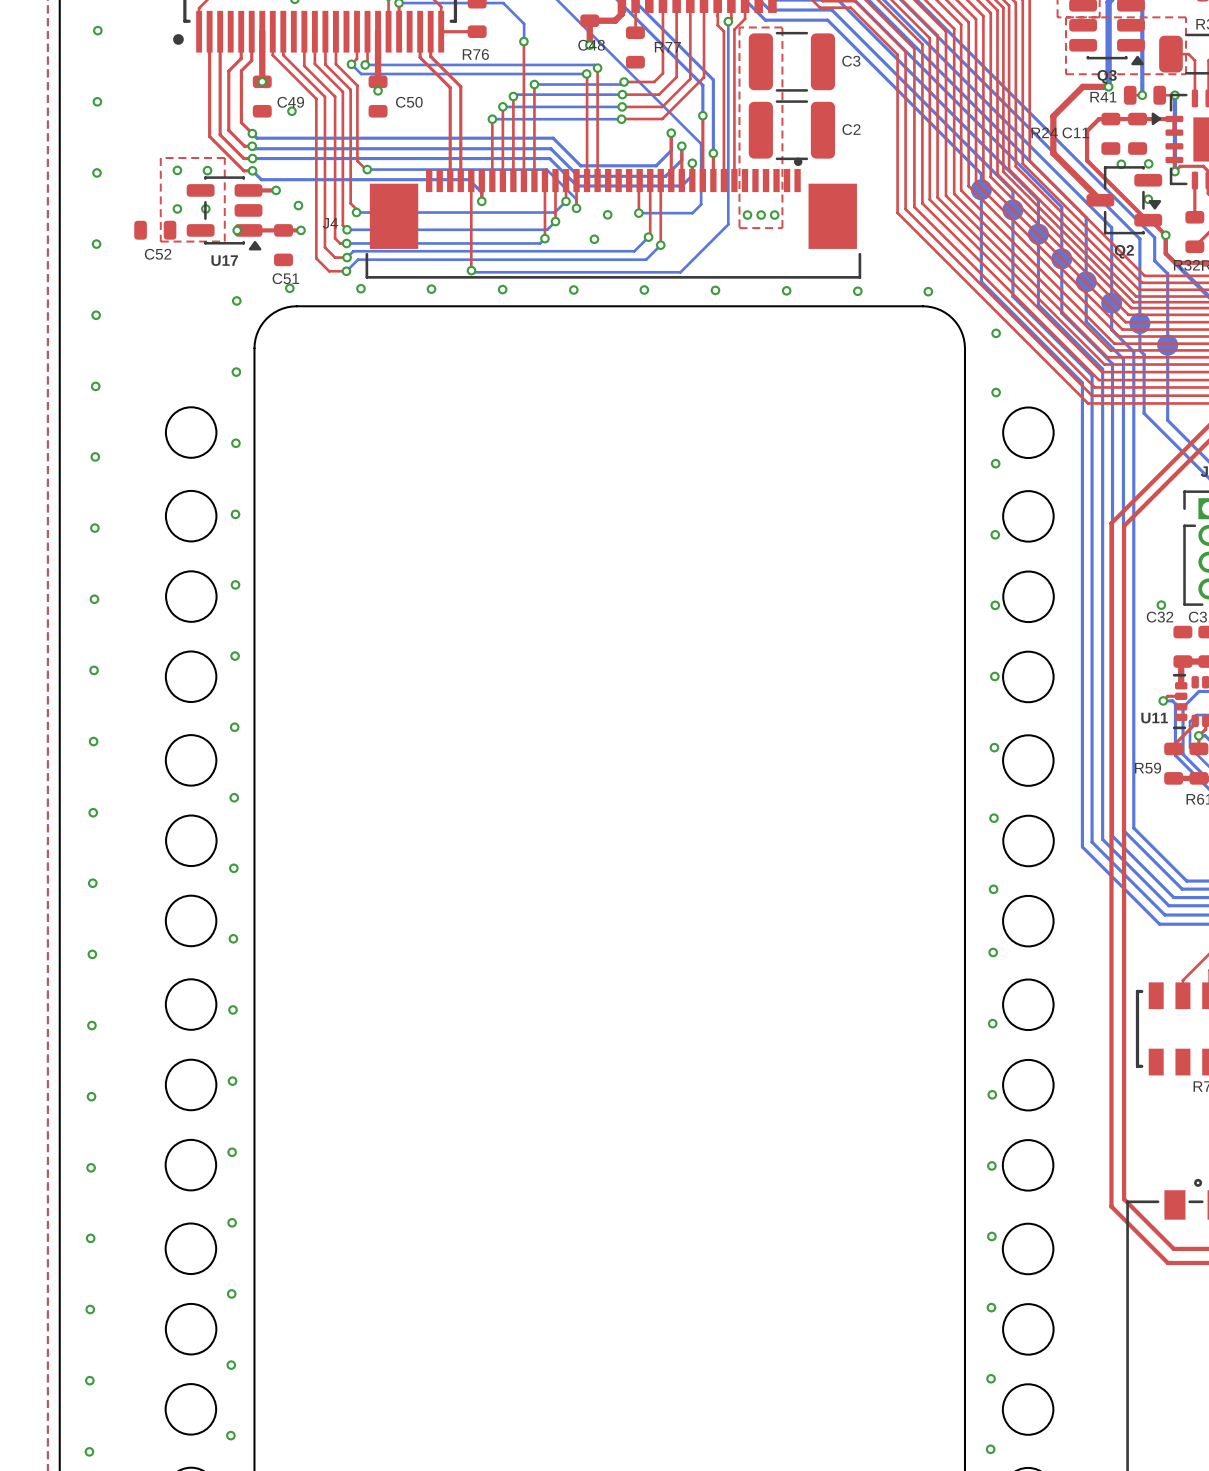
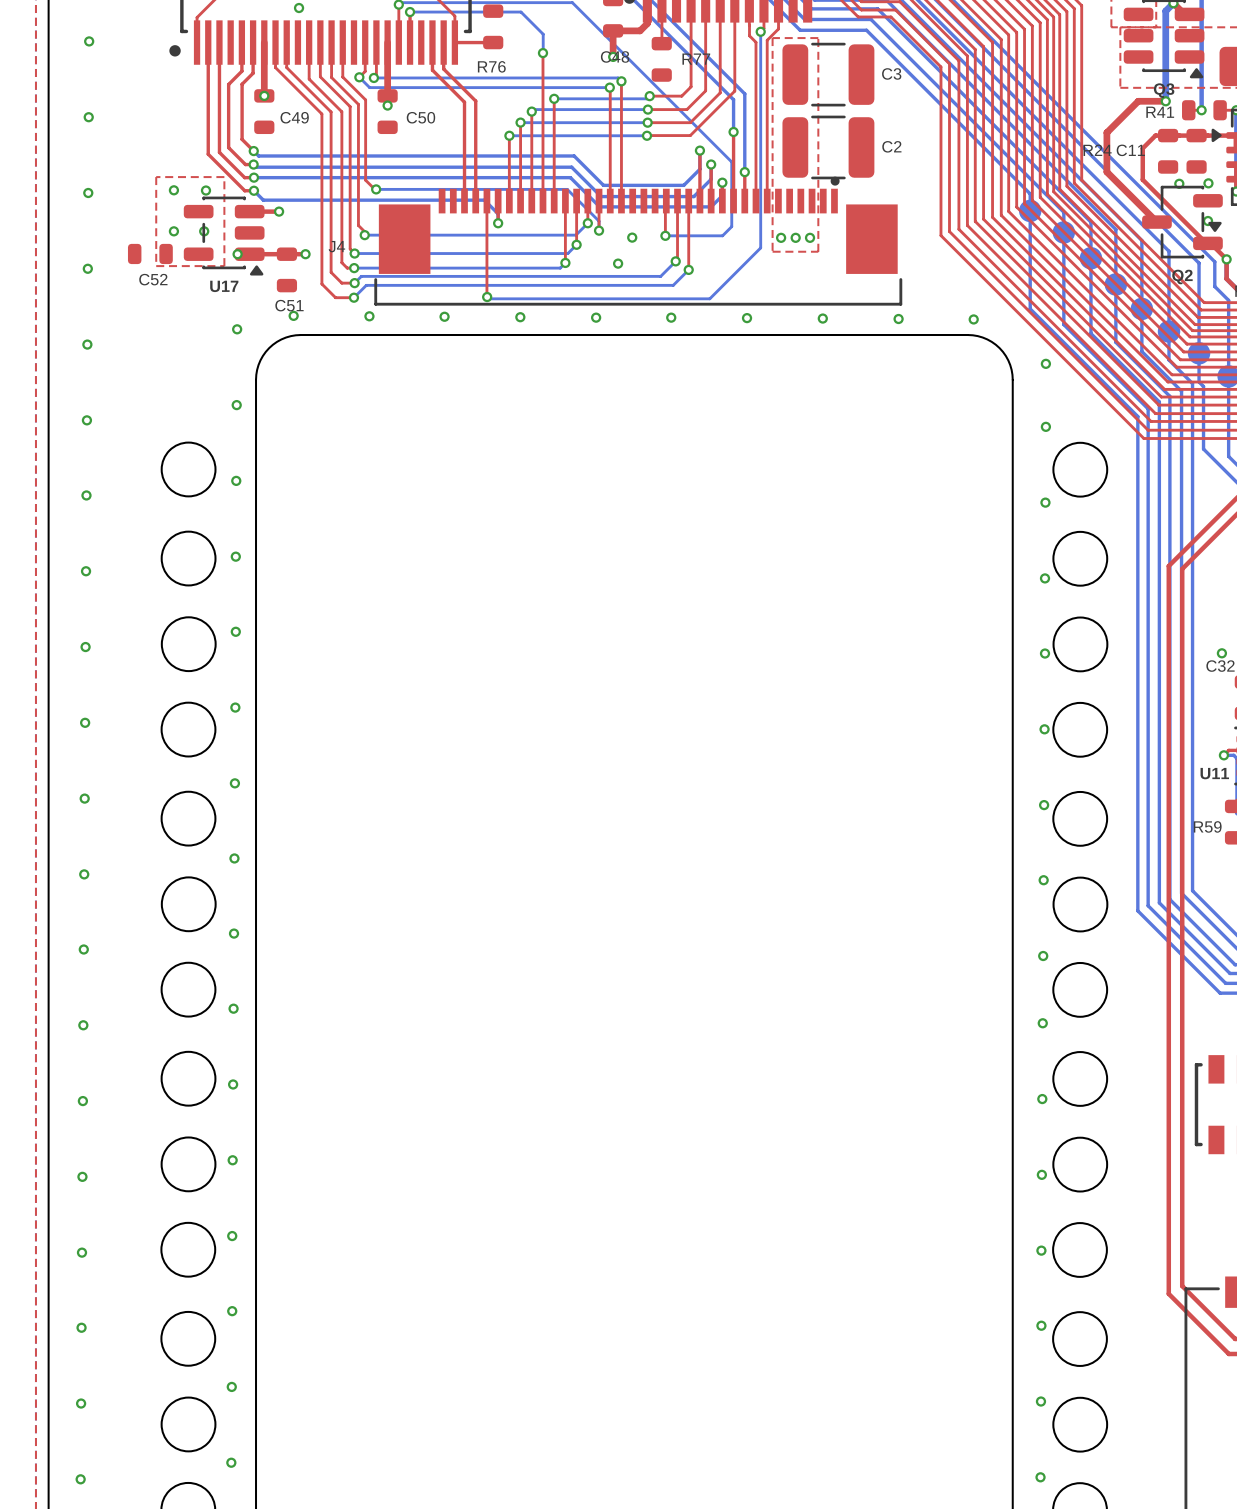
via: (291, 111) -> none
via: (298, 205) -> none

